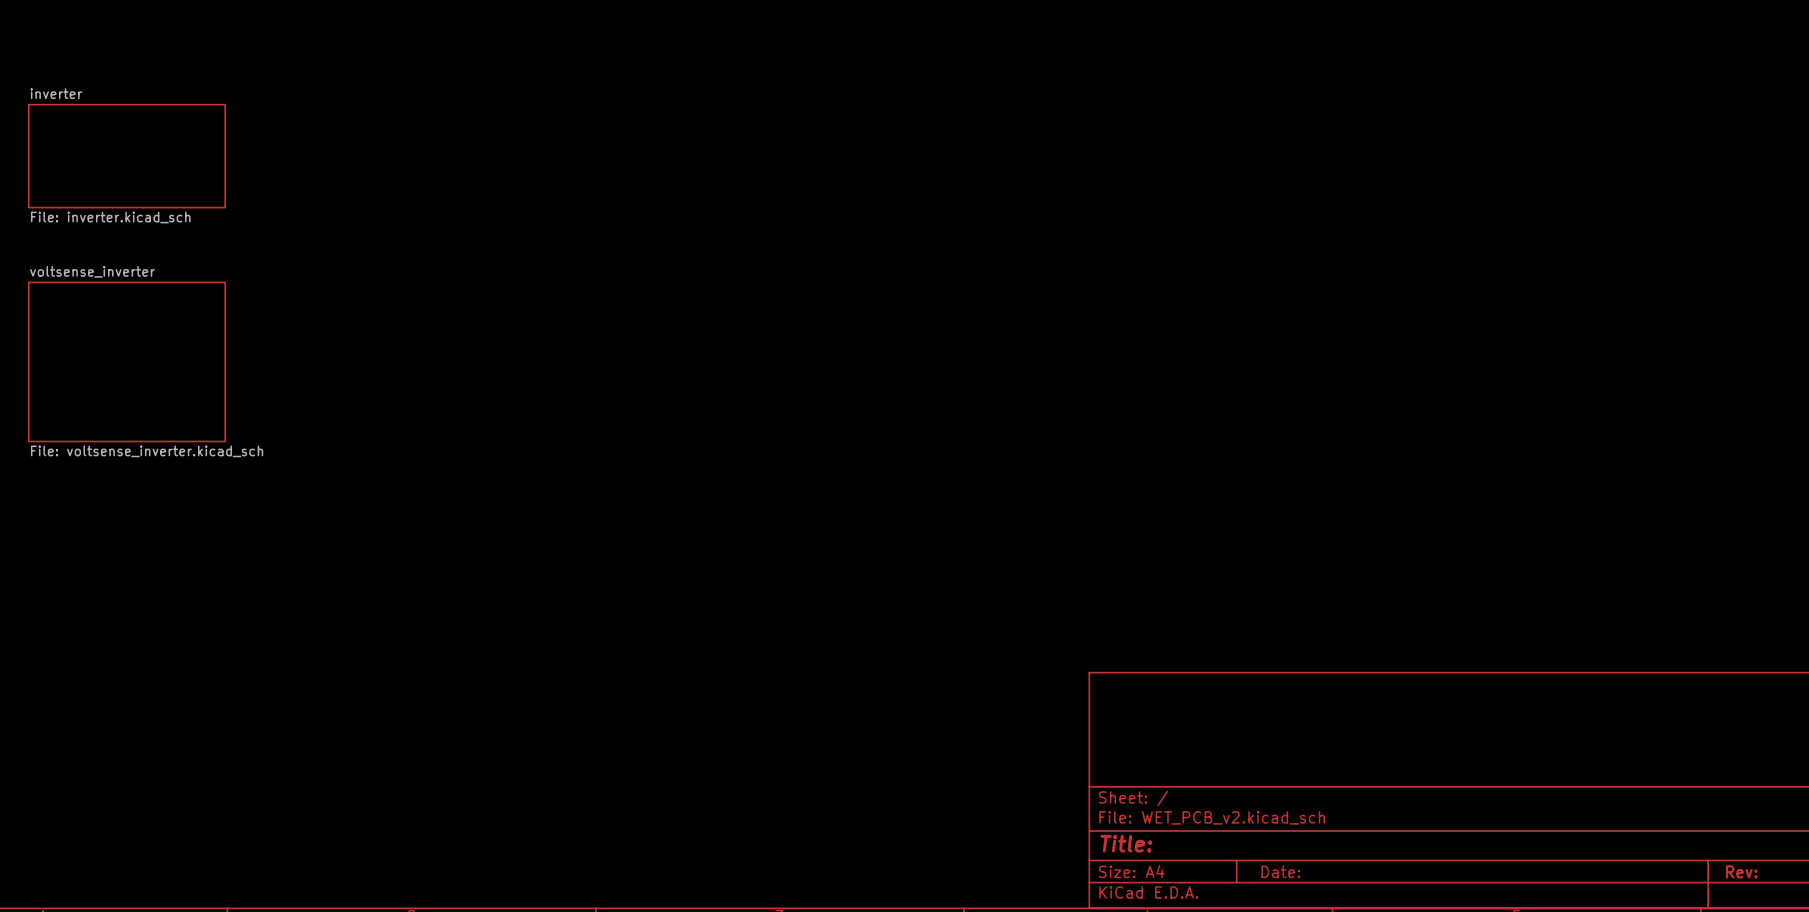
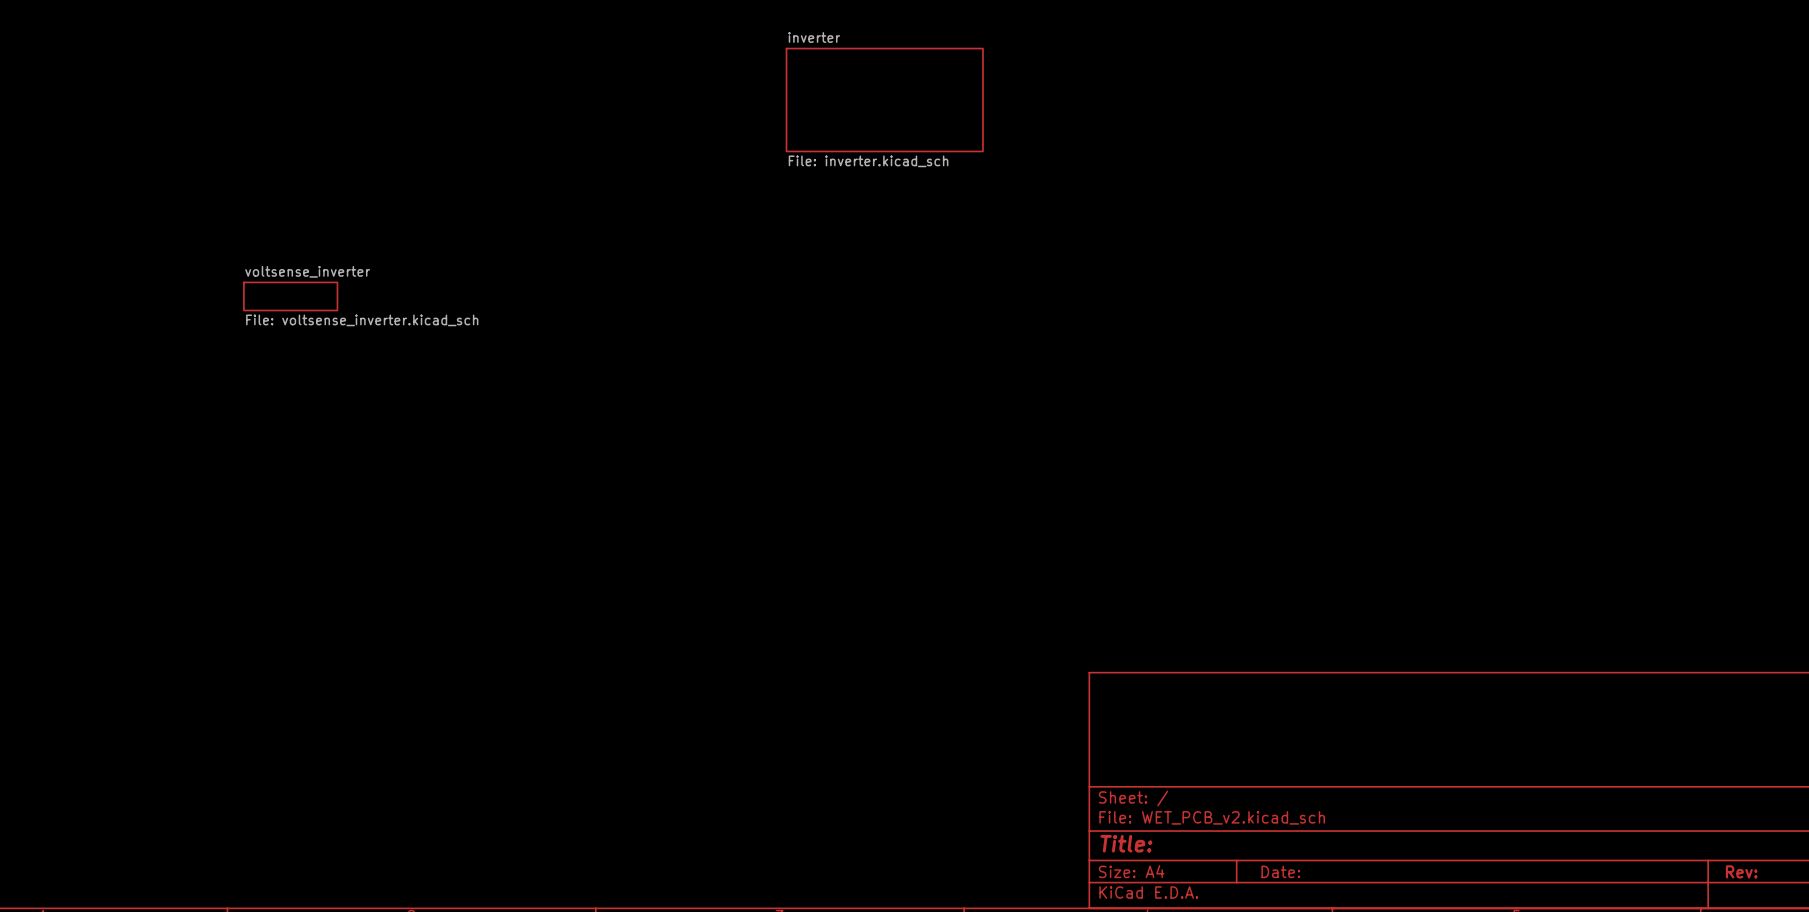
sheet inverter: none -> File: inverter.kicad_sch (884, 100)
sheet inverter: File: inverter.kicad_sch (126, 156) -> none
sheet voltsense_inverter: none -> File: voltsense_inverter.kicad_sch (290, 296)
sheet voltsense_inverter: File: voltsense_inverter.kicad_sch (126, 361) -> none

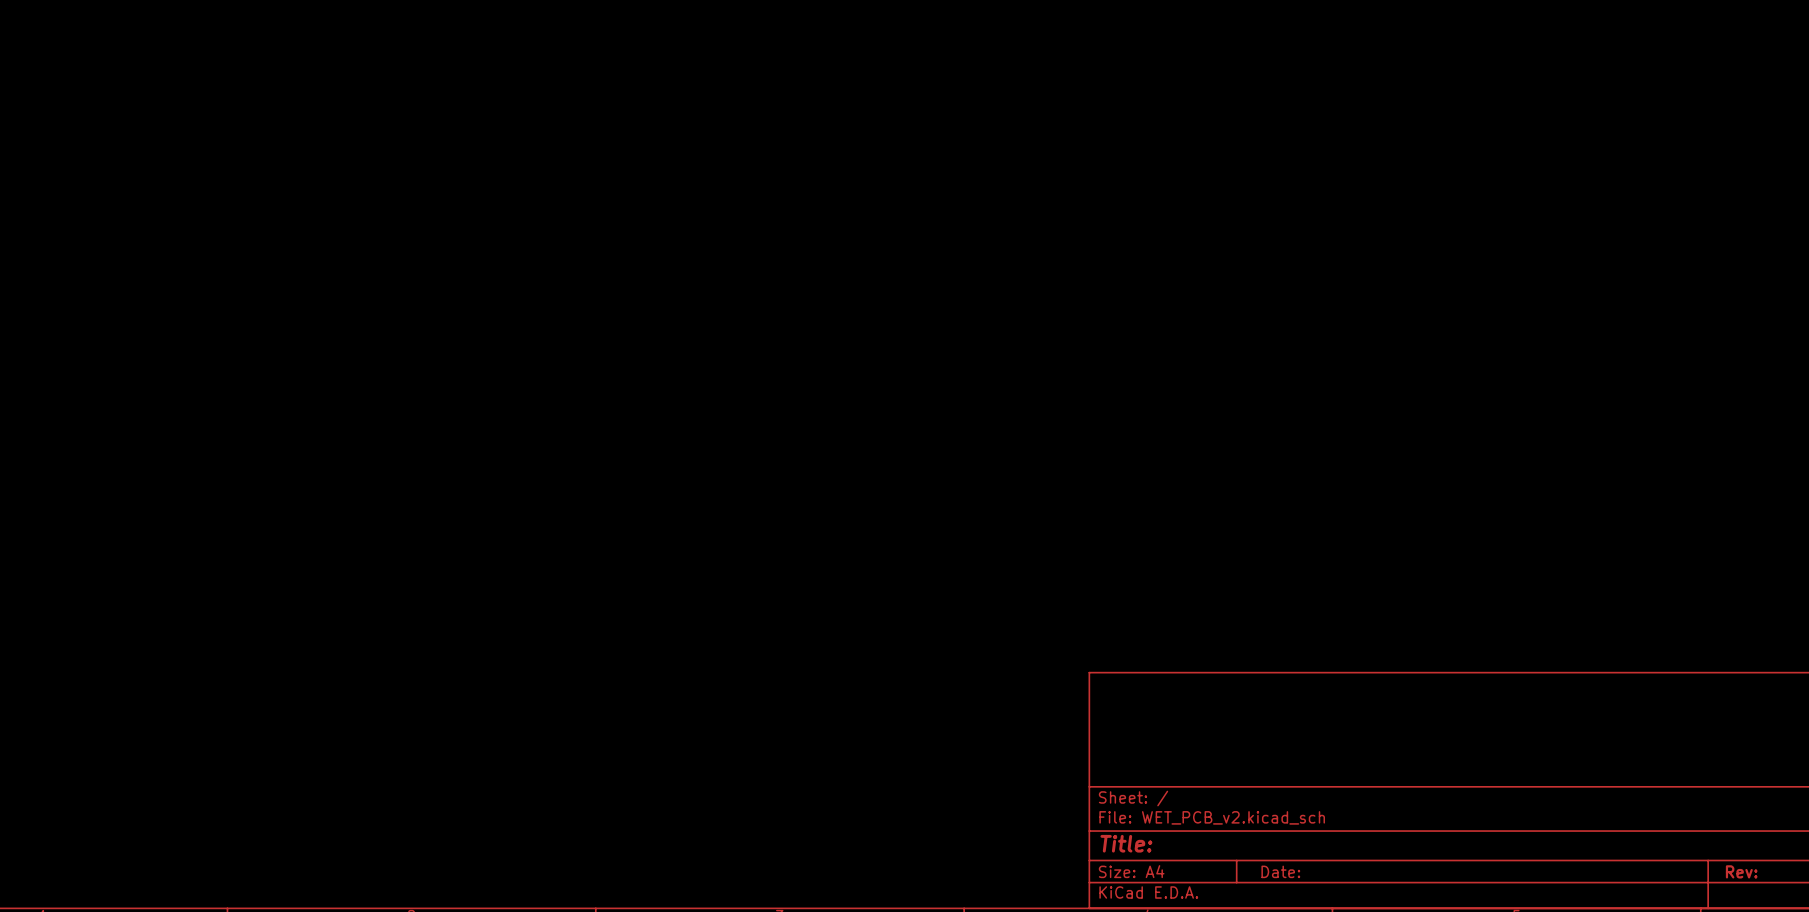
sheet inverter: File: inverter.kicad_sch (884, 100) -> none
sheet voltsense_inverter: File: voltsense_inverter.kicad_sch (290, 296) -> none

